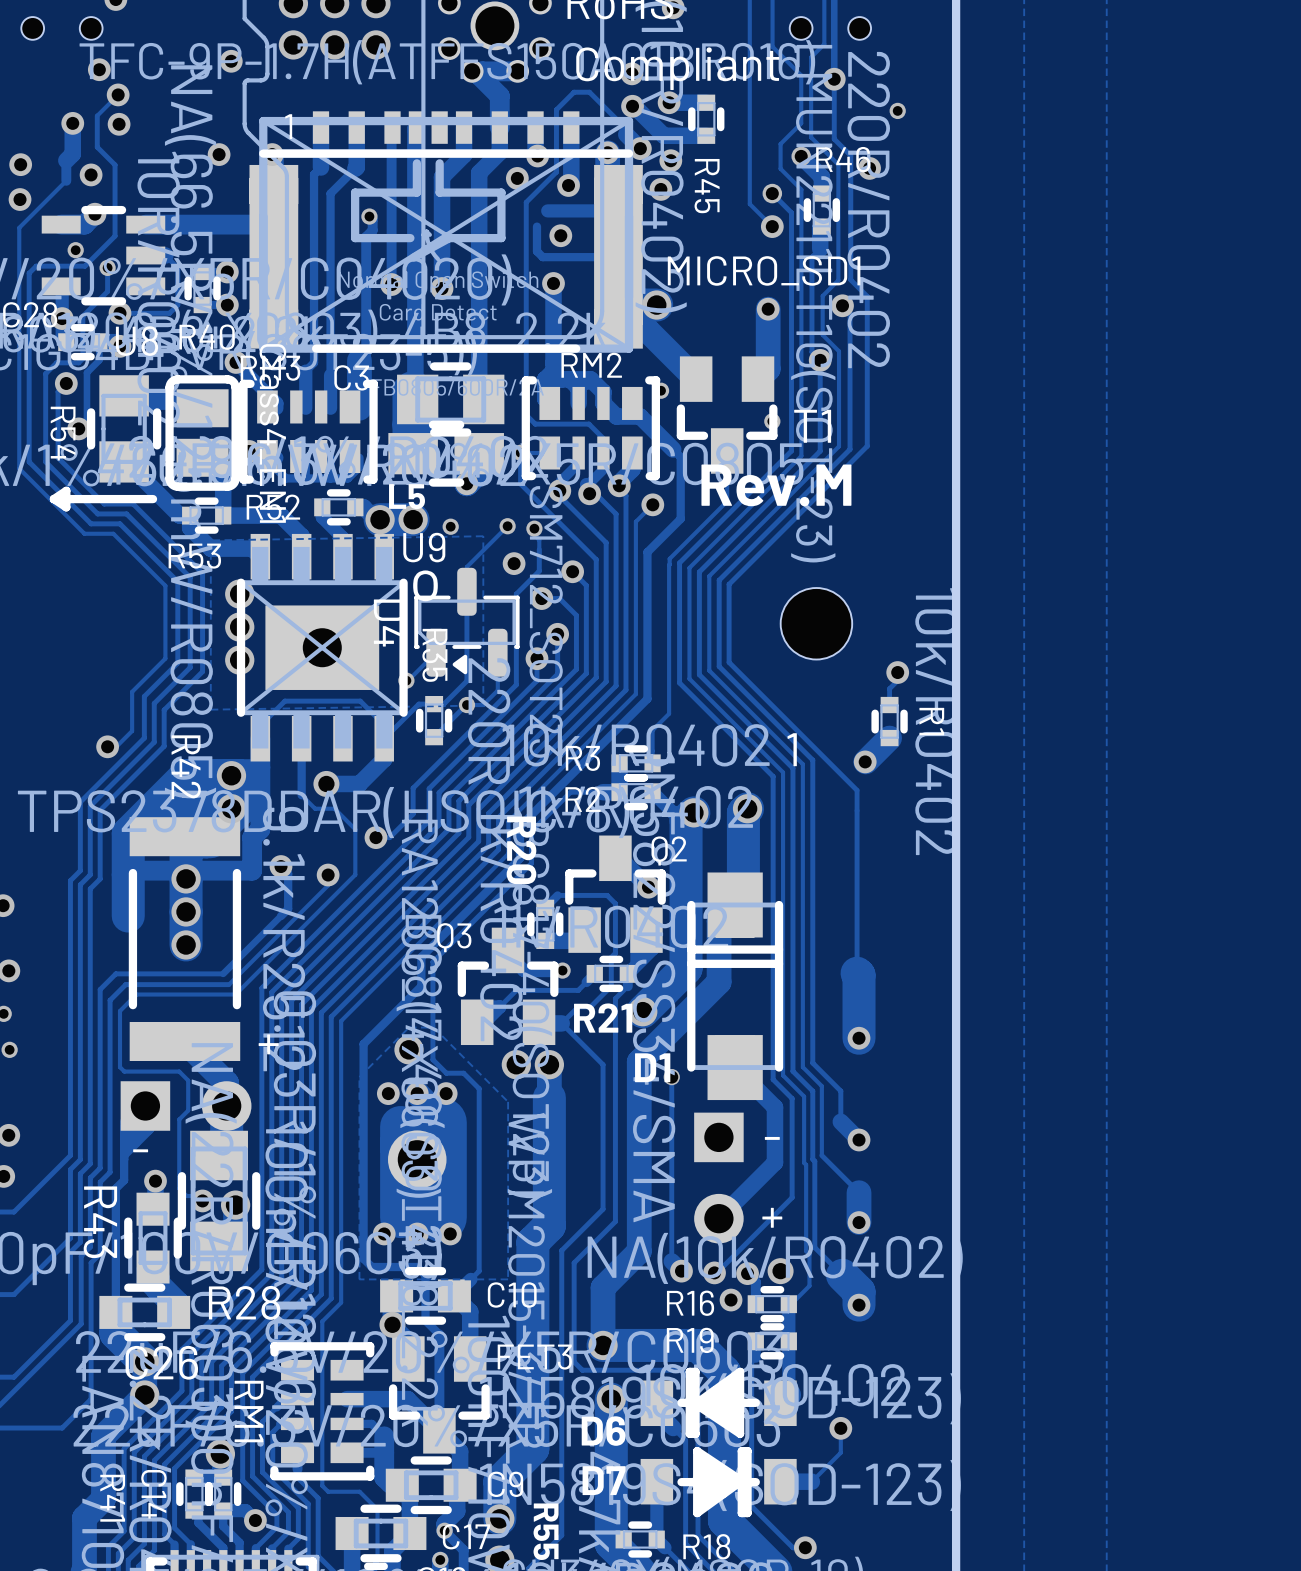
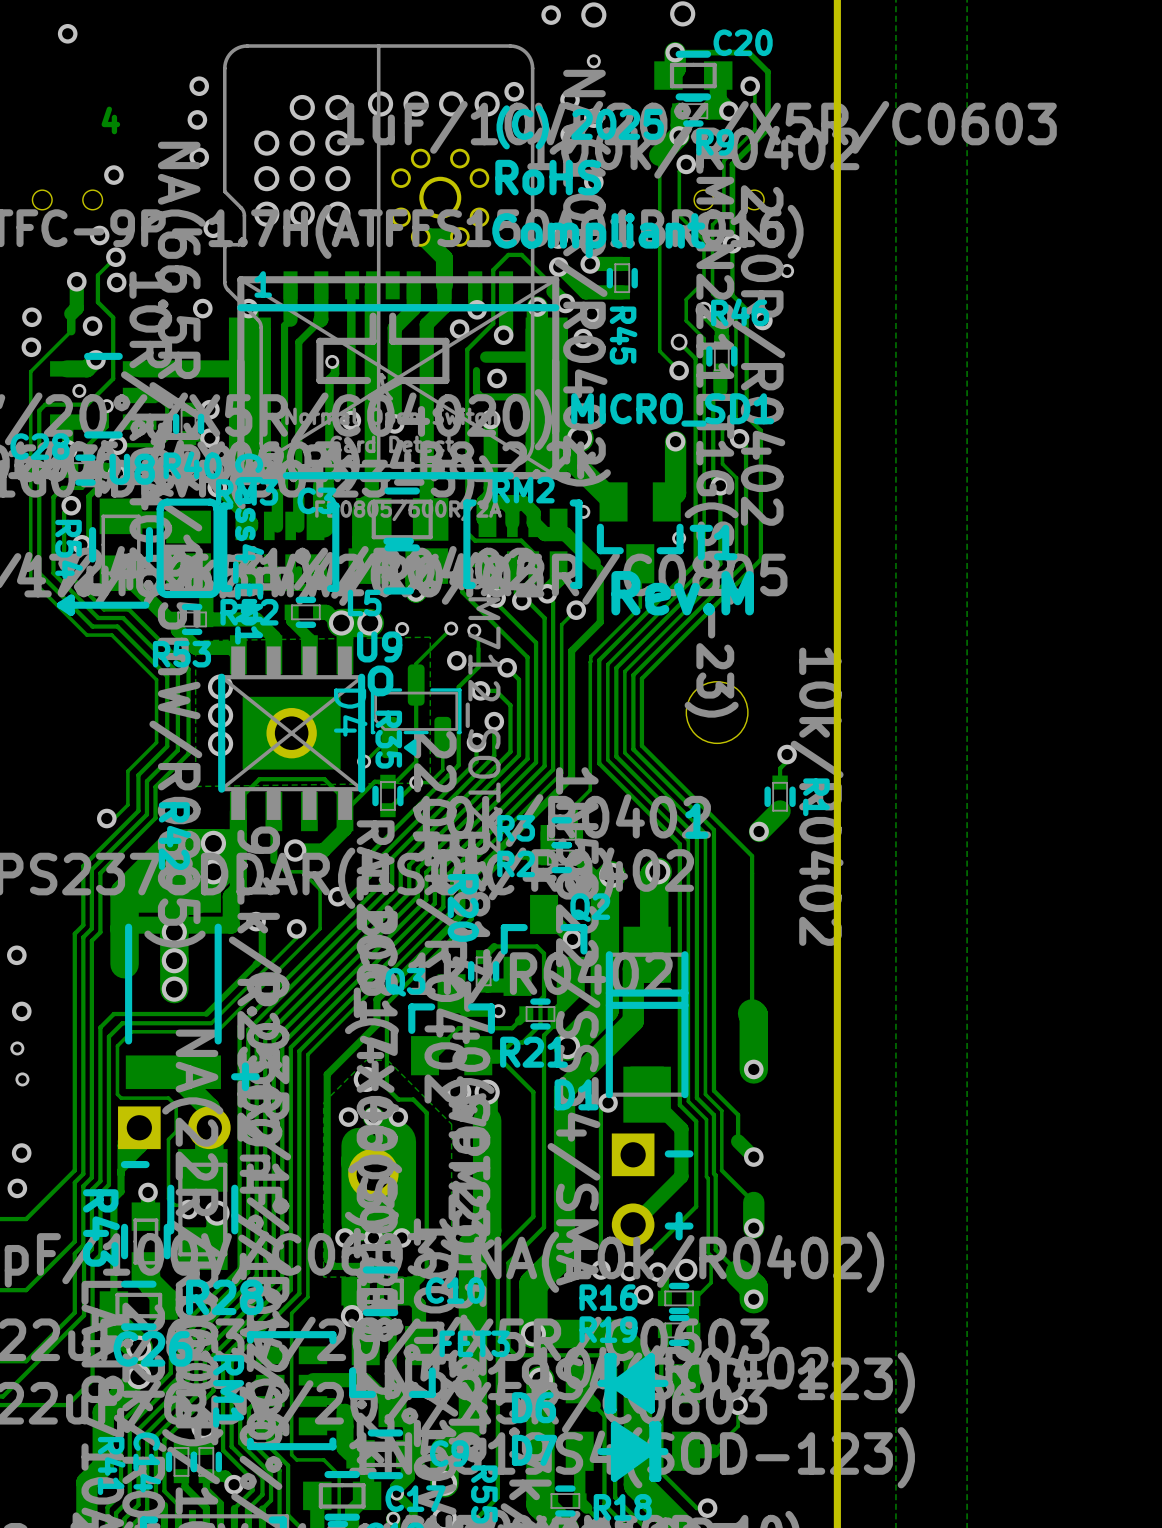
track: (671, 1077) (671, 1261) (681, 1271) -> (608, 1102) (600, 1110) (600, 1269)
via position: (671, 1077) -> (608, 1102)
track width: thin (639, 1251) (603, 1287) (603, 1345) -> thick (564, 1253) (533, 1284) (533, 1333)

